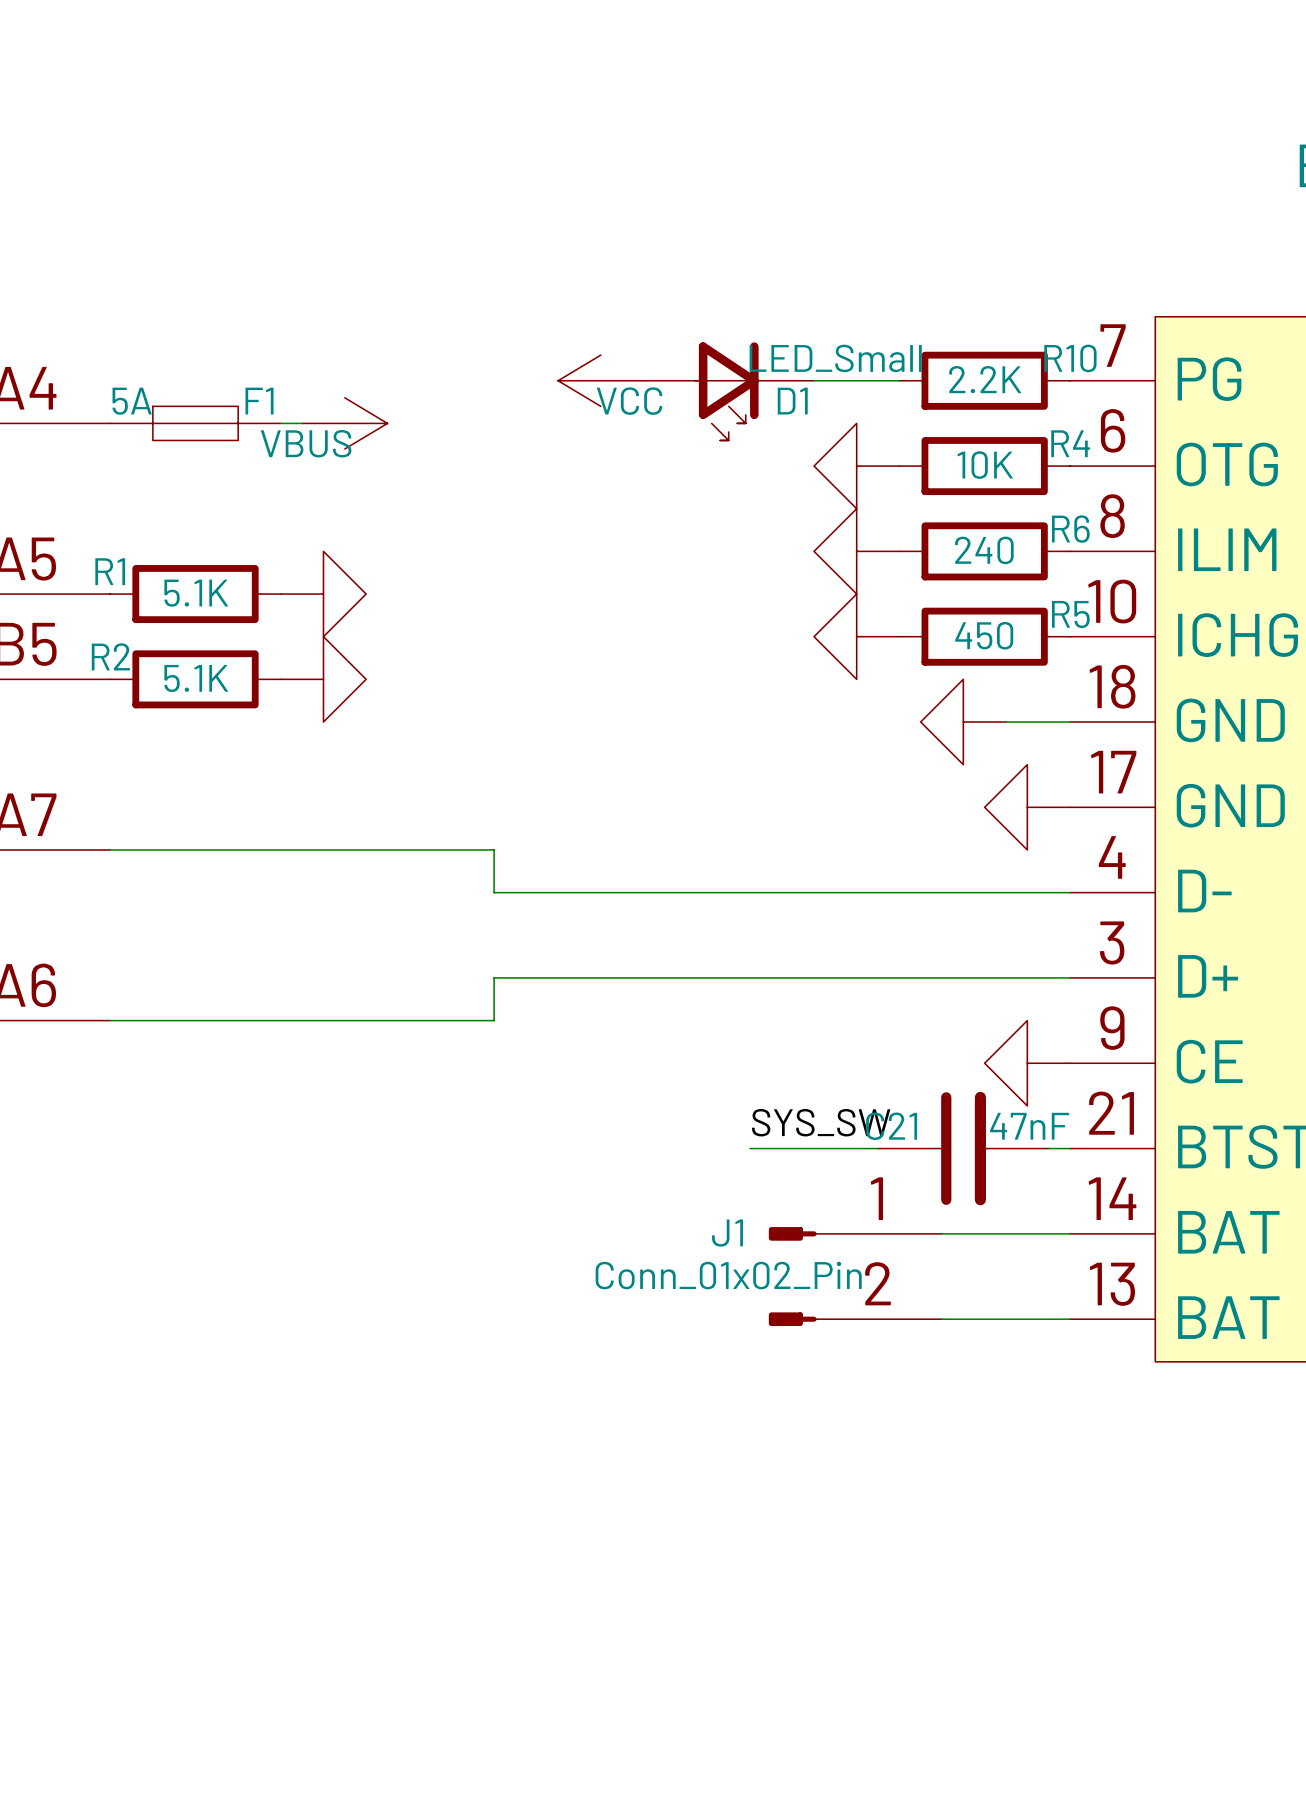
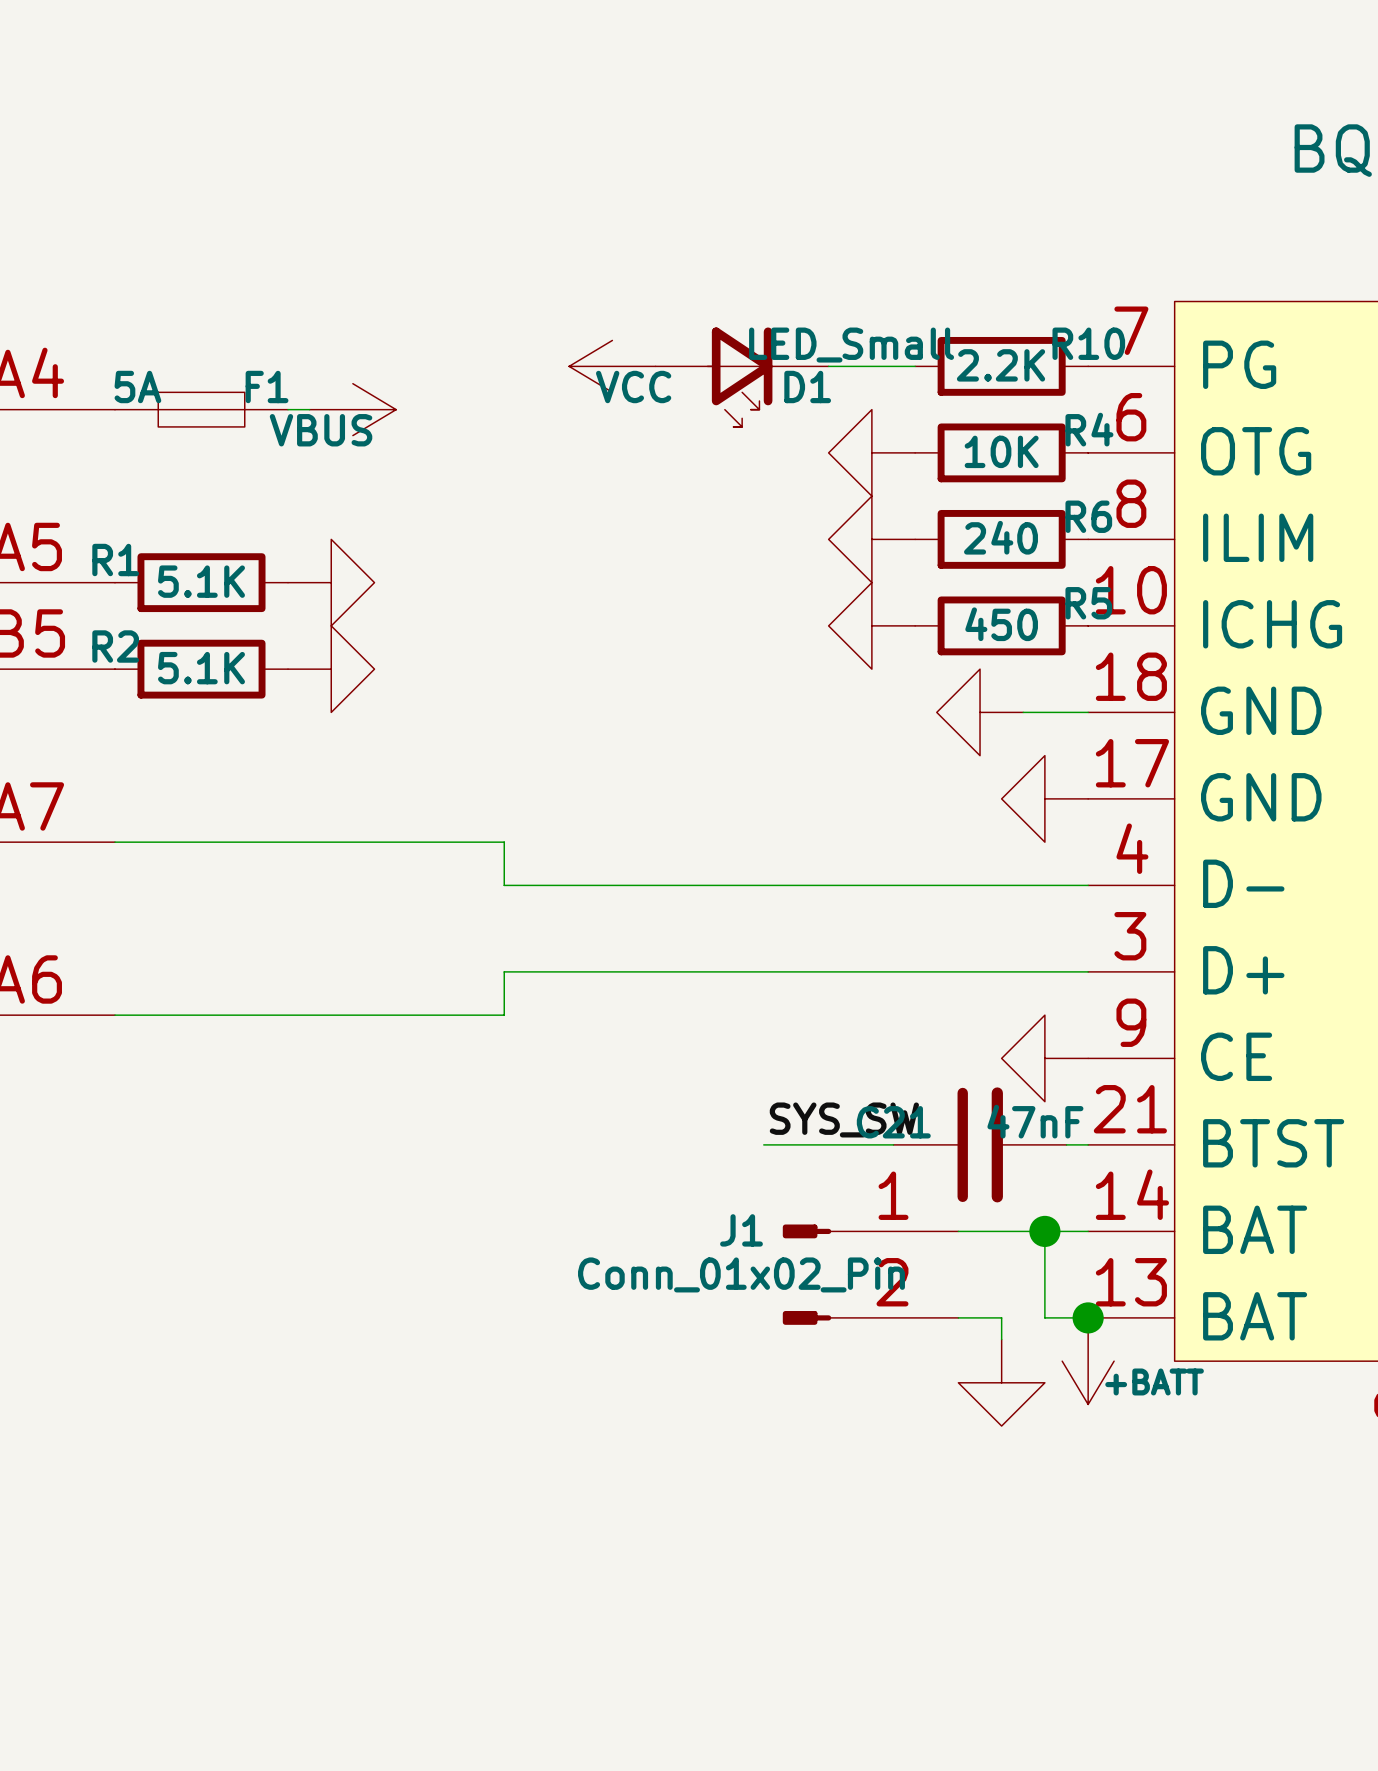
wire: none -> (1044, 1231) (1044, 1317)
junction: none -> (1044, 1231)
wire: (984, 1319) (1027, 1319) -> (1001, 1317) (1001, 1339)
junction: none -> (1088, 1317)
power symbol: none -> +BATT (1088, 1361)
power symbol: none -> (1001, 1382)

